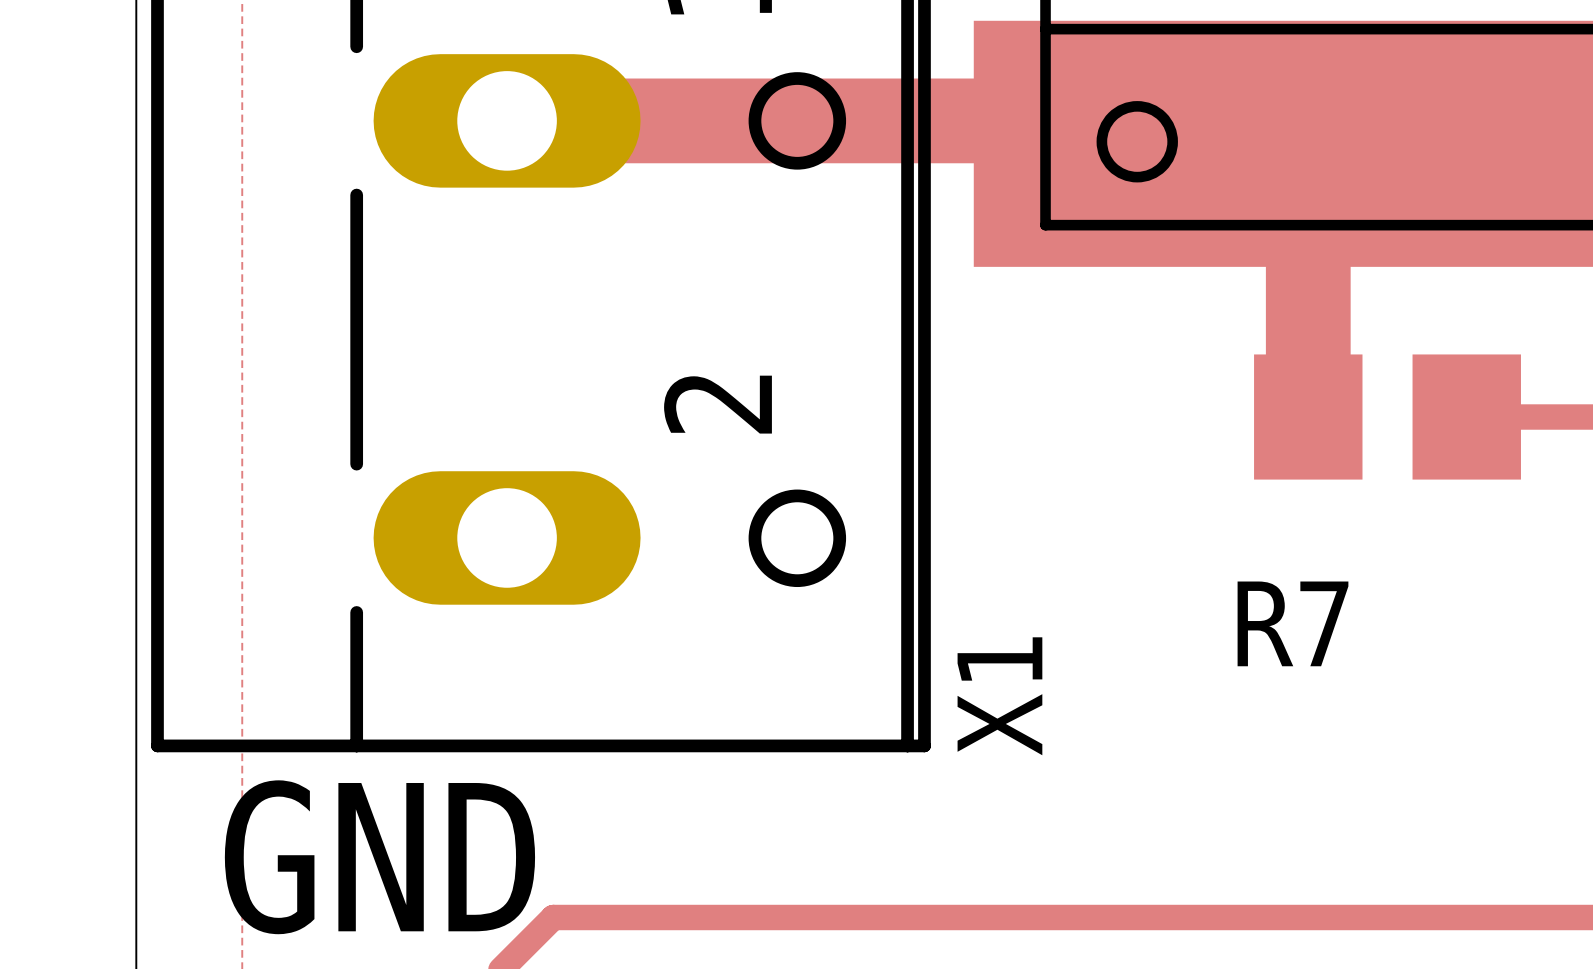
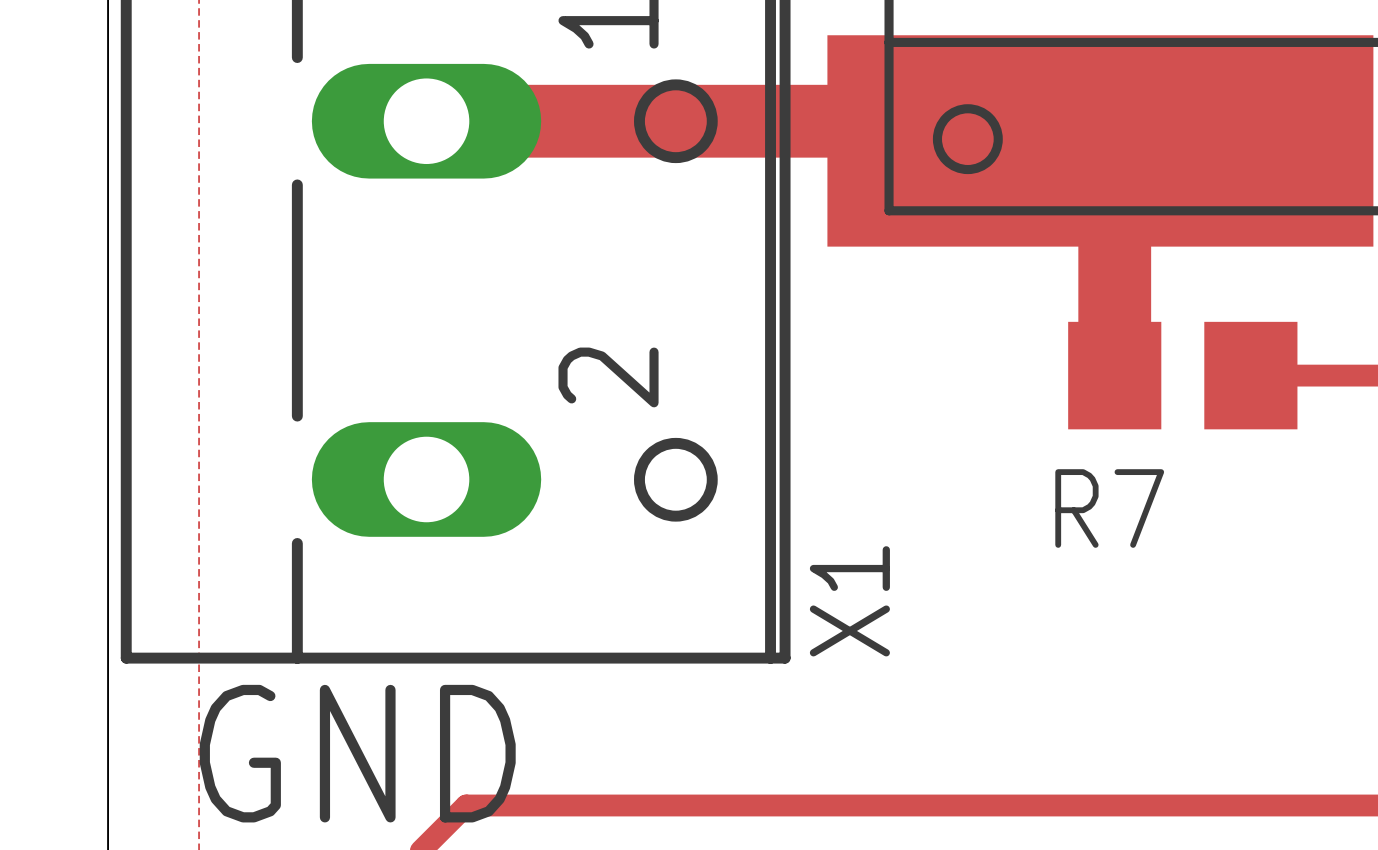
R7 name position: R7 (1292, 623) -> R7 (1109, 508)

